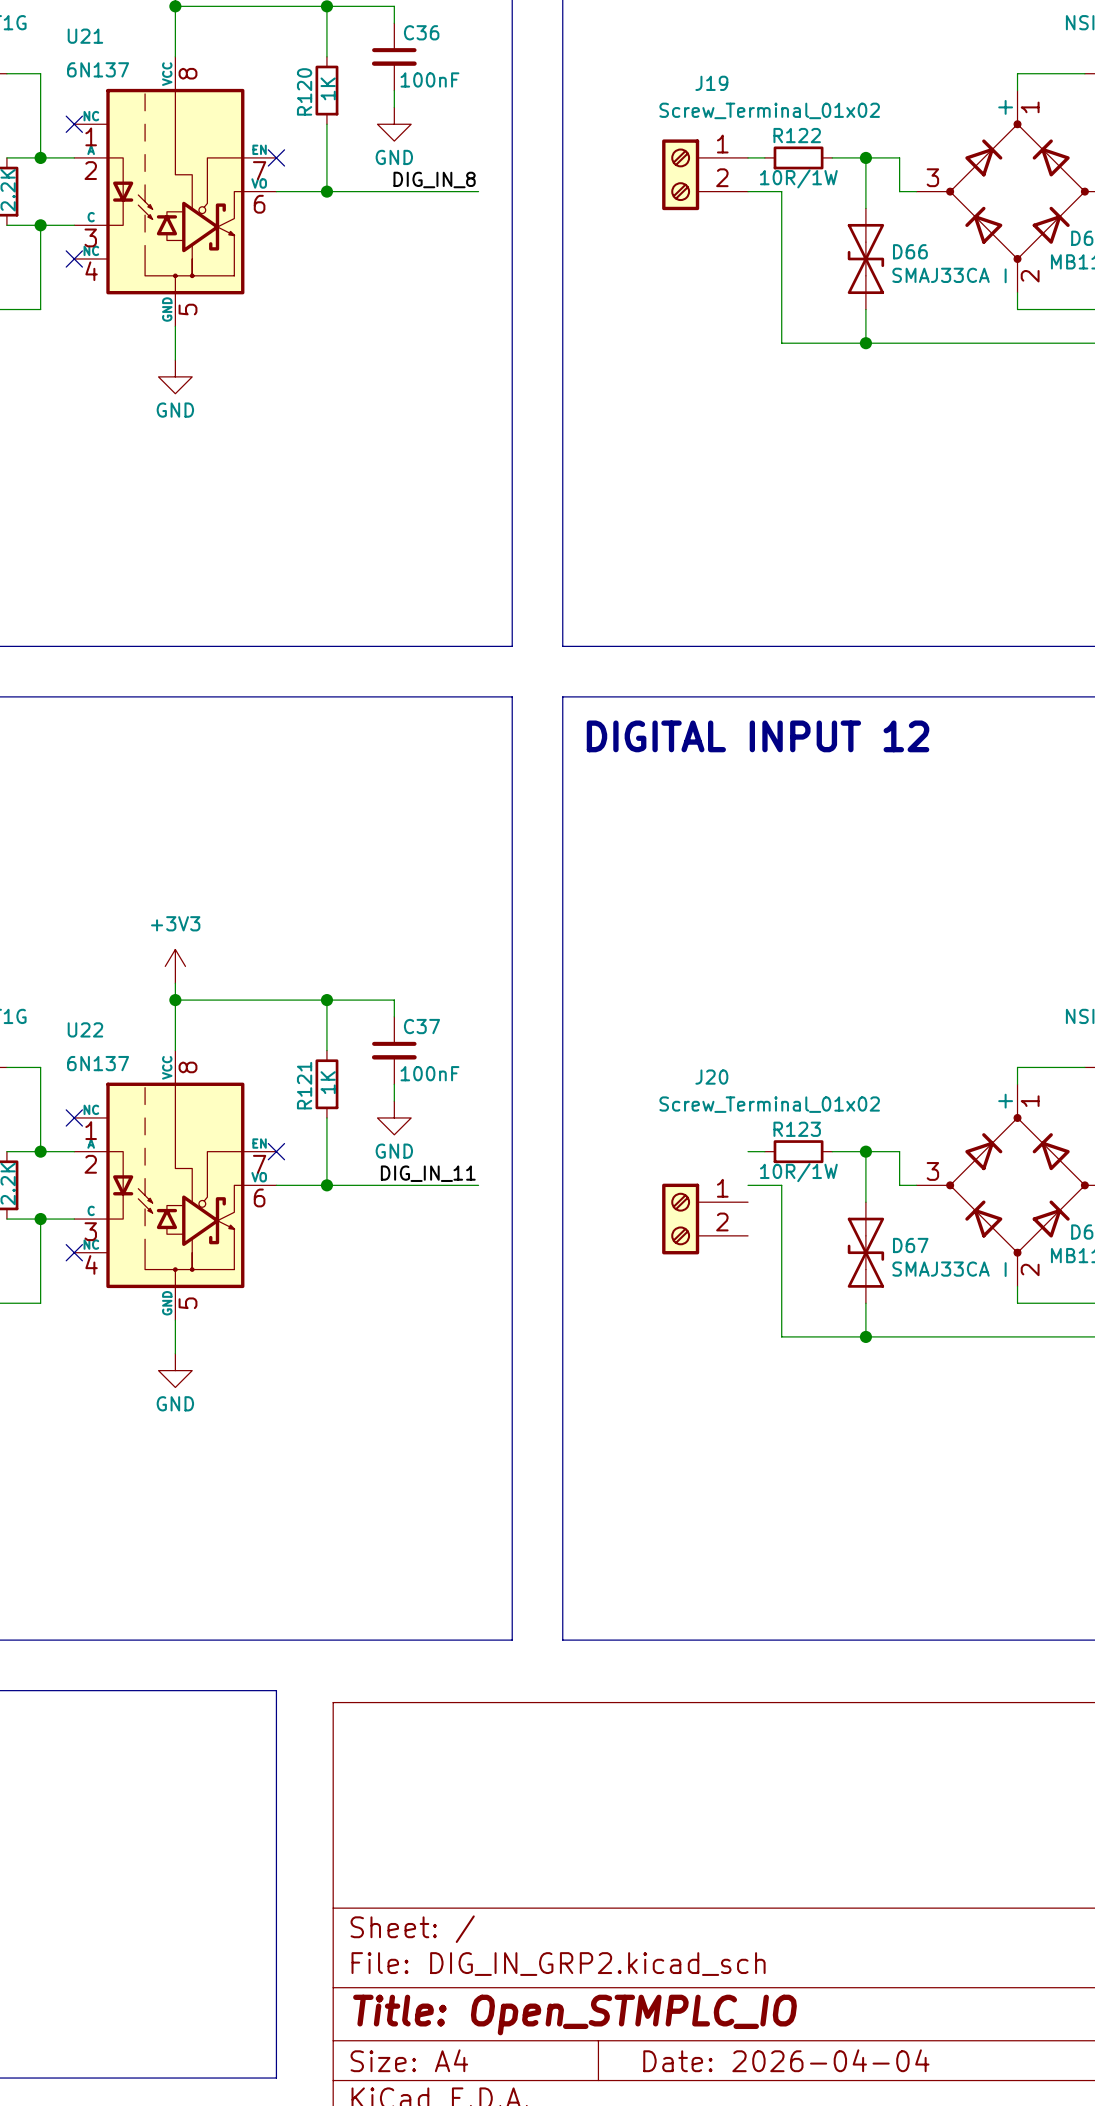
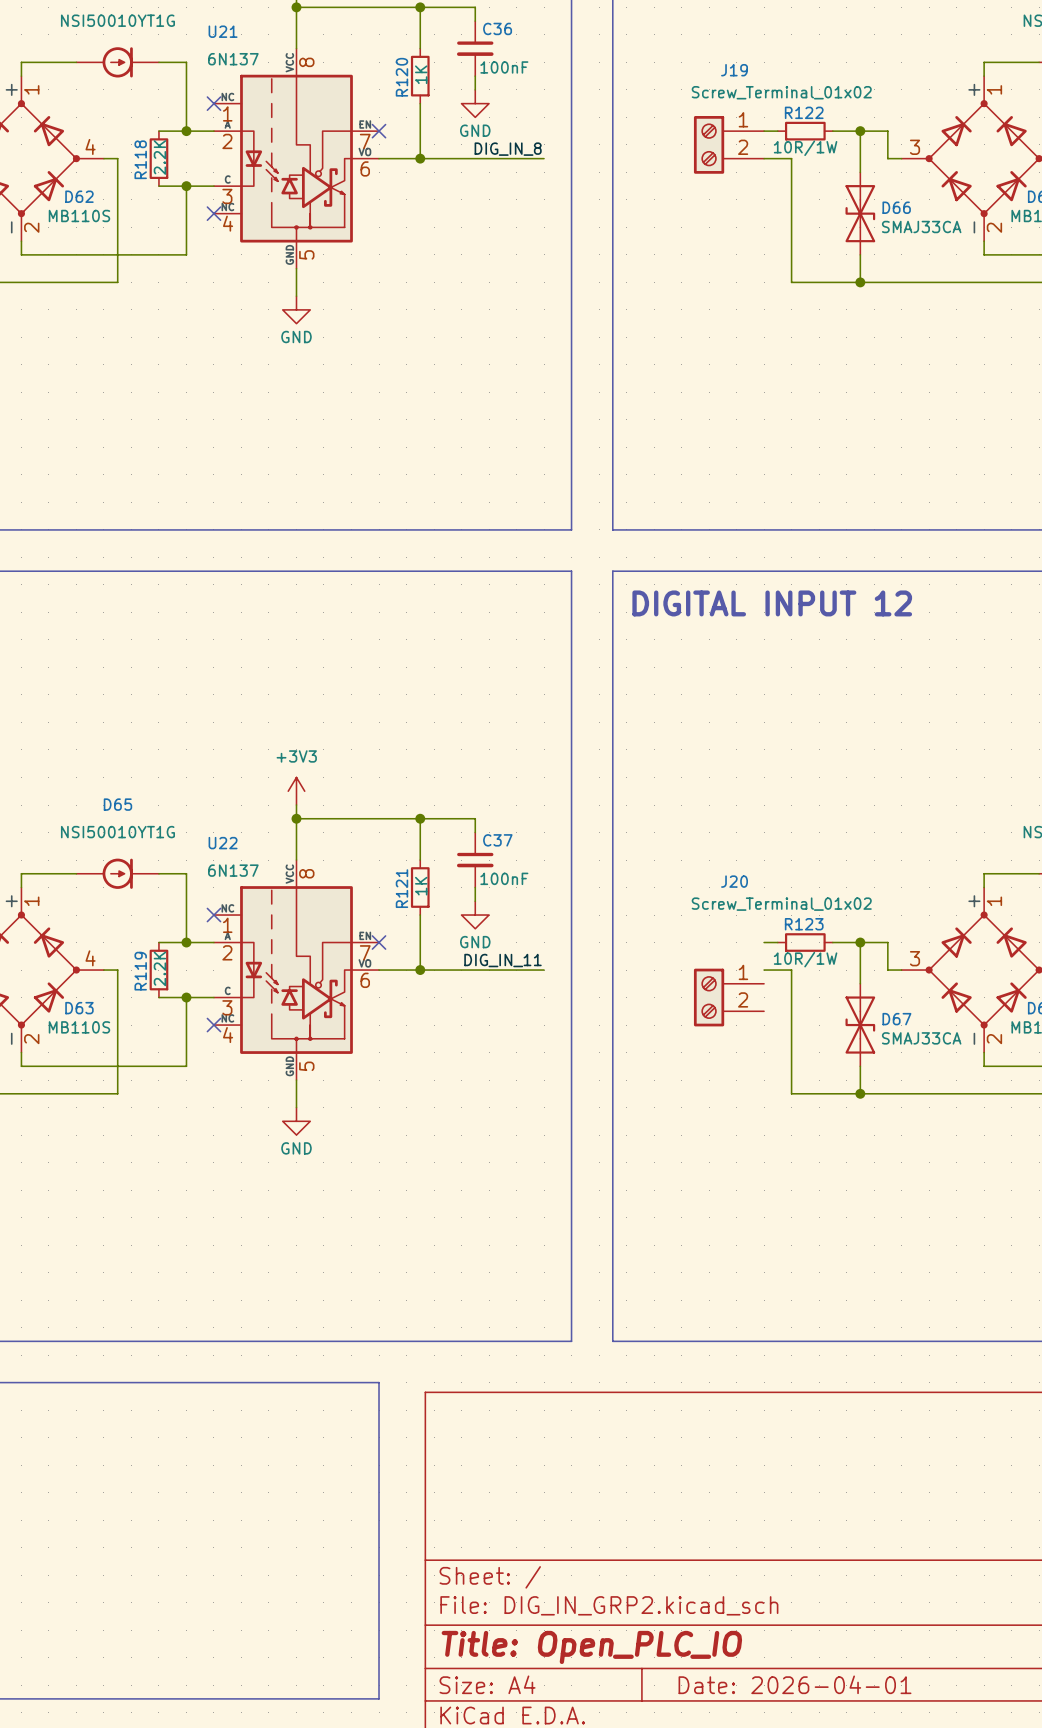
title block: Title: Open_STMPLC_IO (575, 2015) -> Title: Open_PLC_IO (591, 1647)
title block: Date: 2026-04-04 (786, 2060) -> Date: 2026-04-01 (795, 1684)

